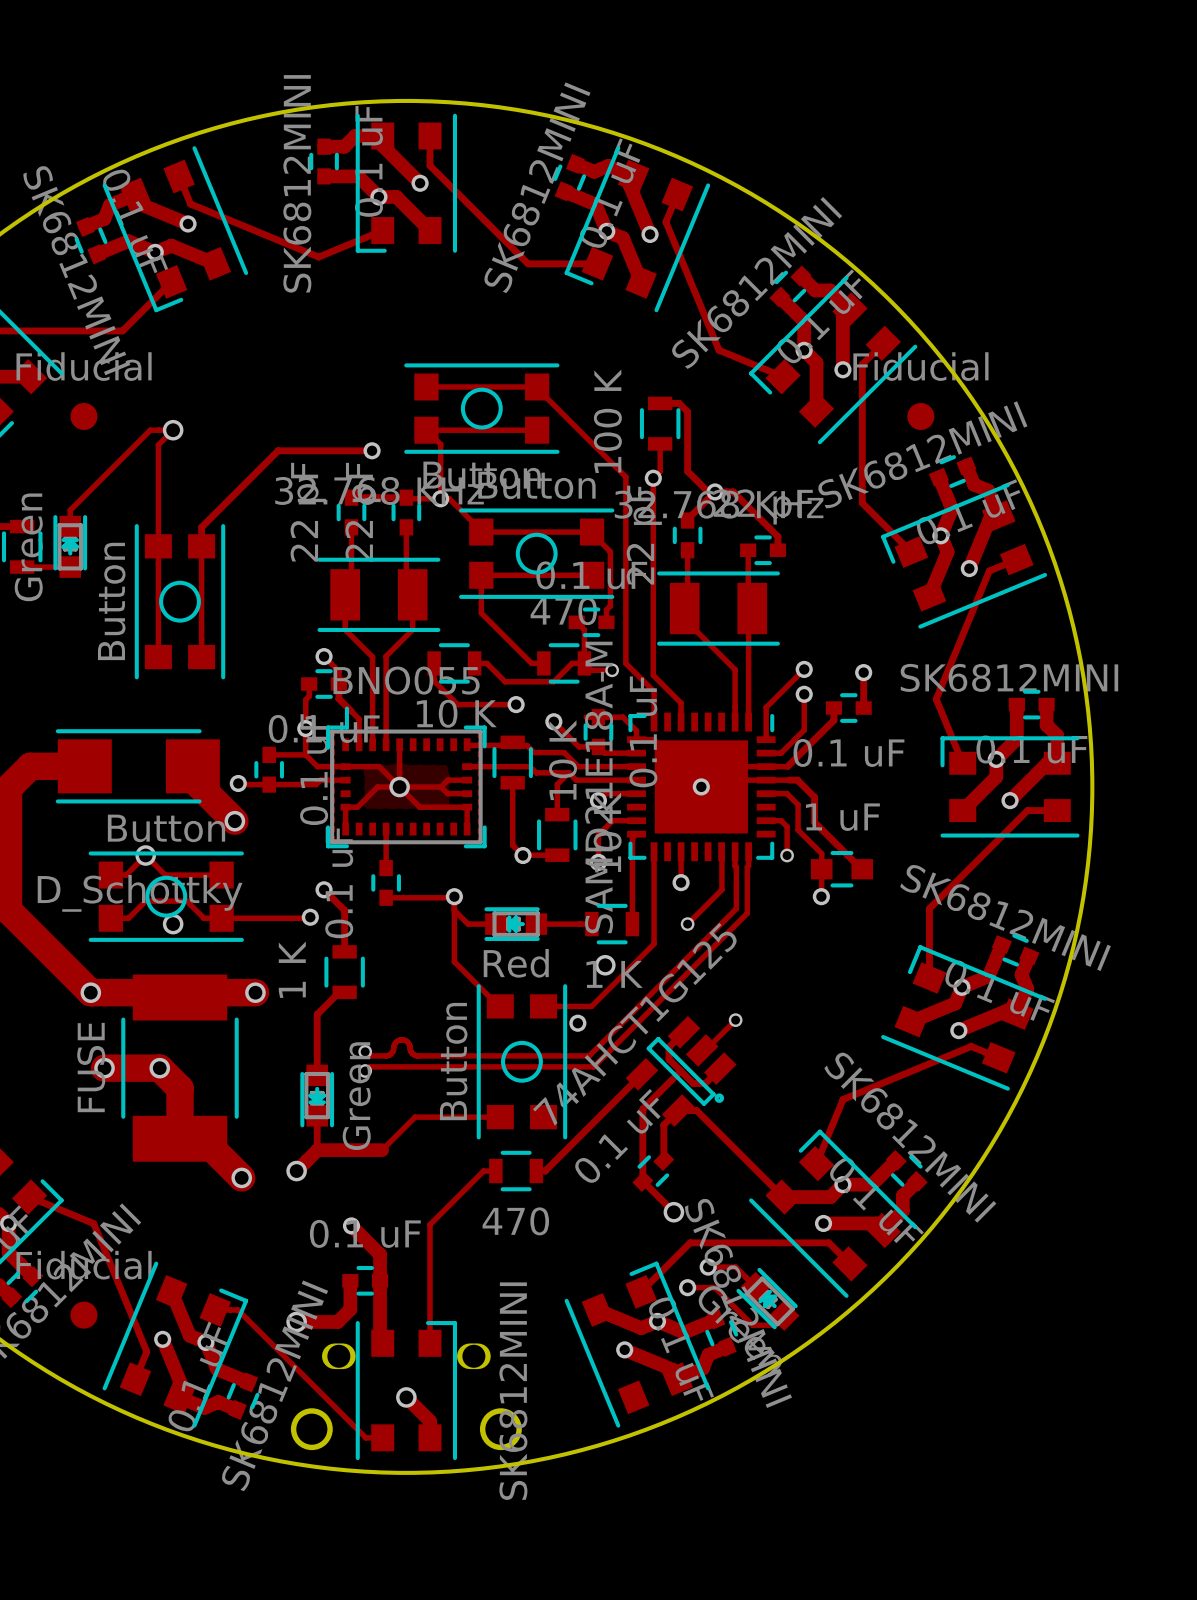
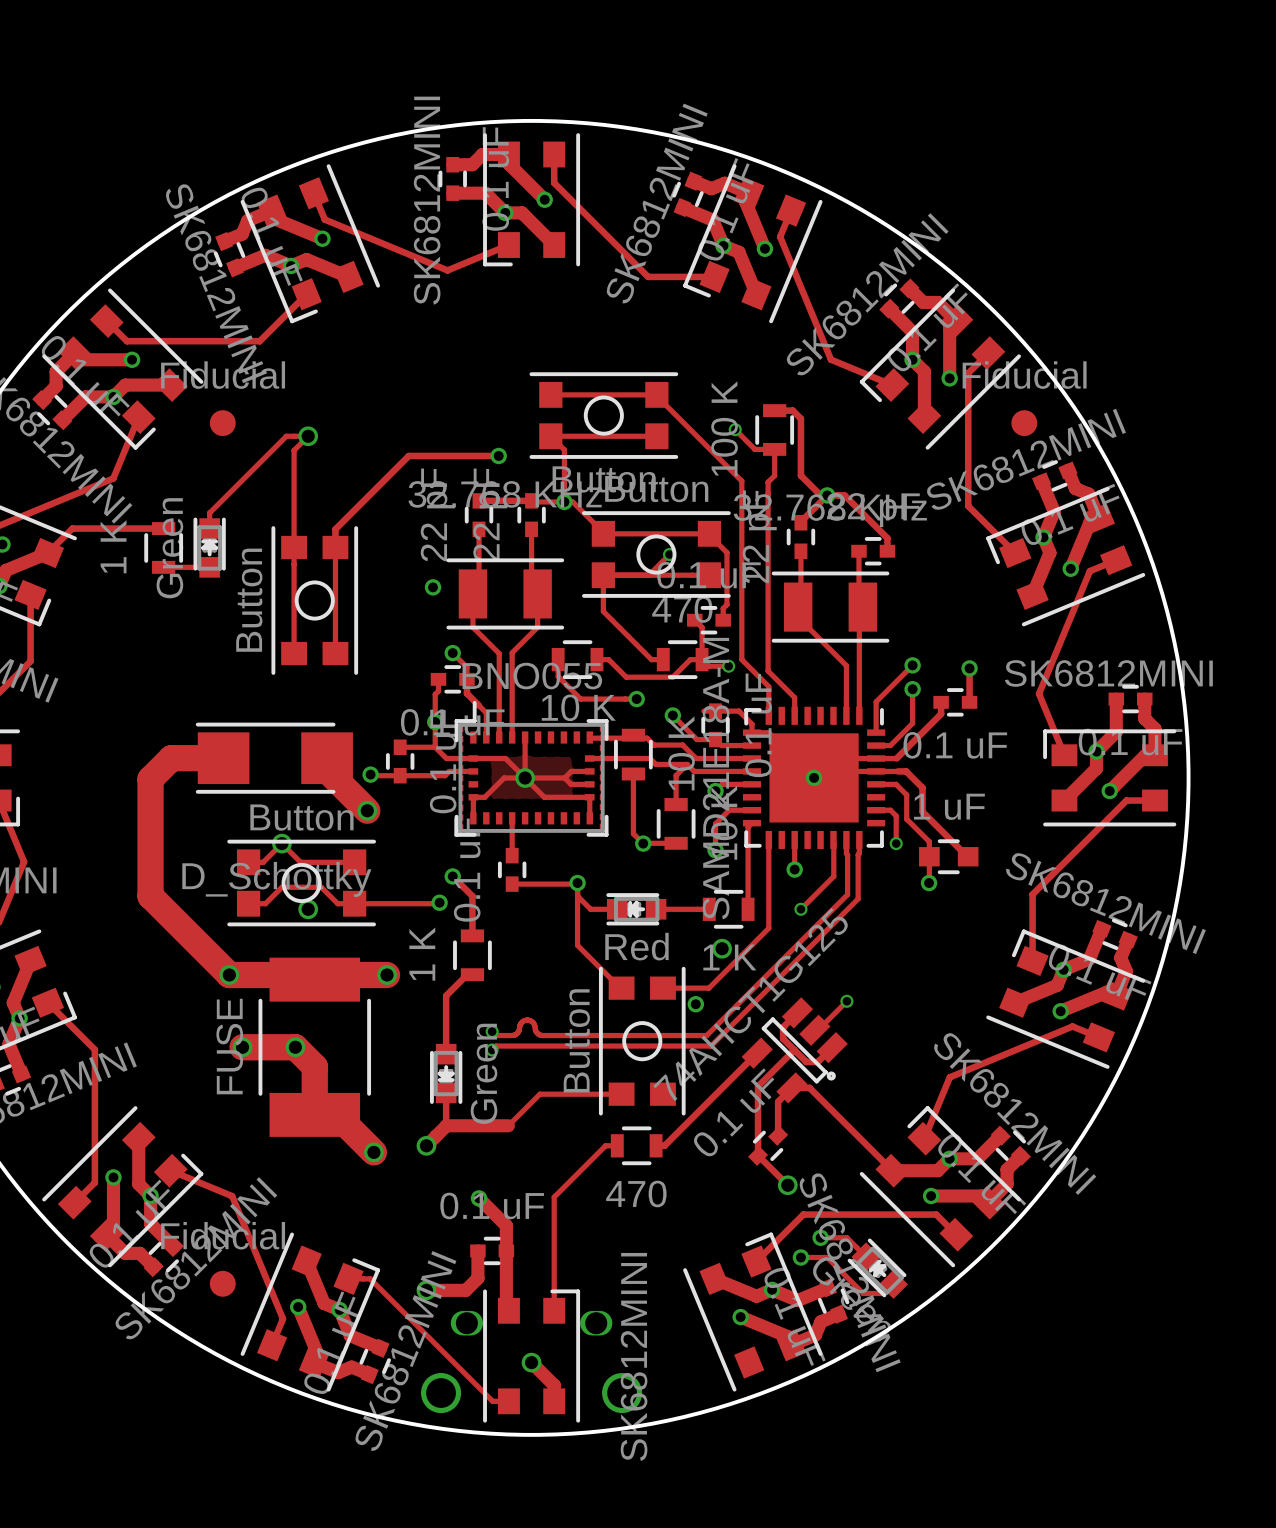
track: none -> (735, 429) (754, 449) (774, 449)
via: none -> (735, 429)
via: (653, 478) -> none
track: none -> (669, 554) (648, 575)
via: none -> (669, 554)
via: none -> (433, 587)

